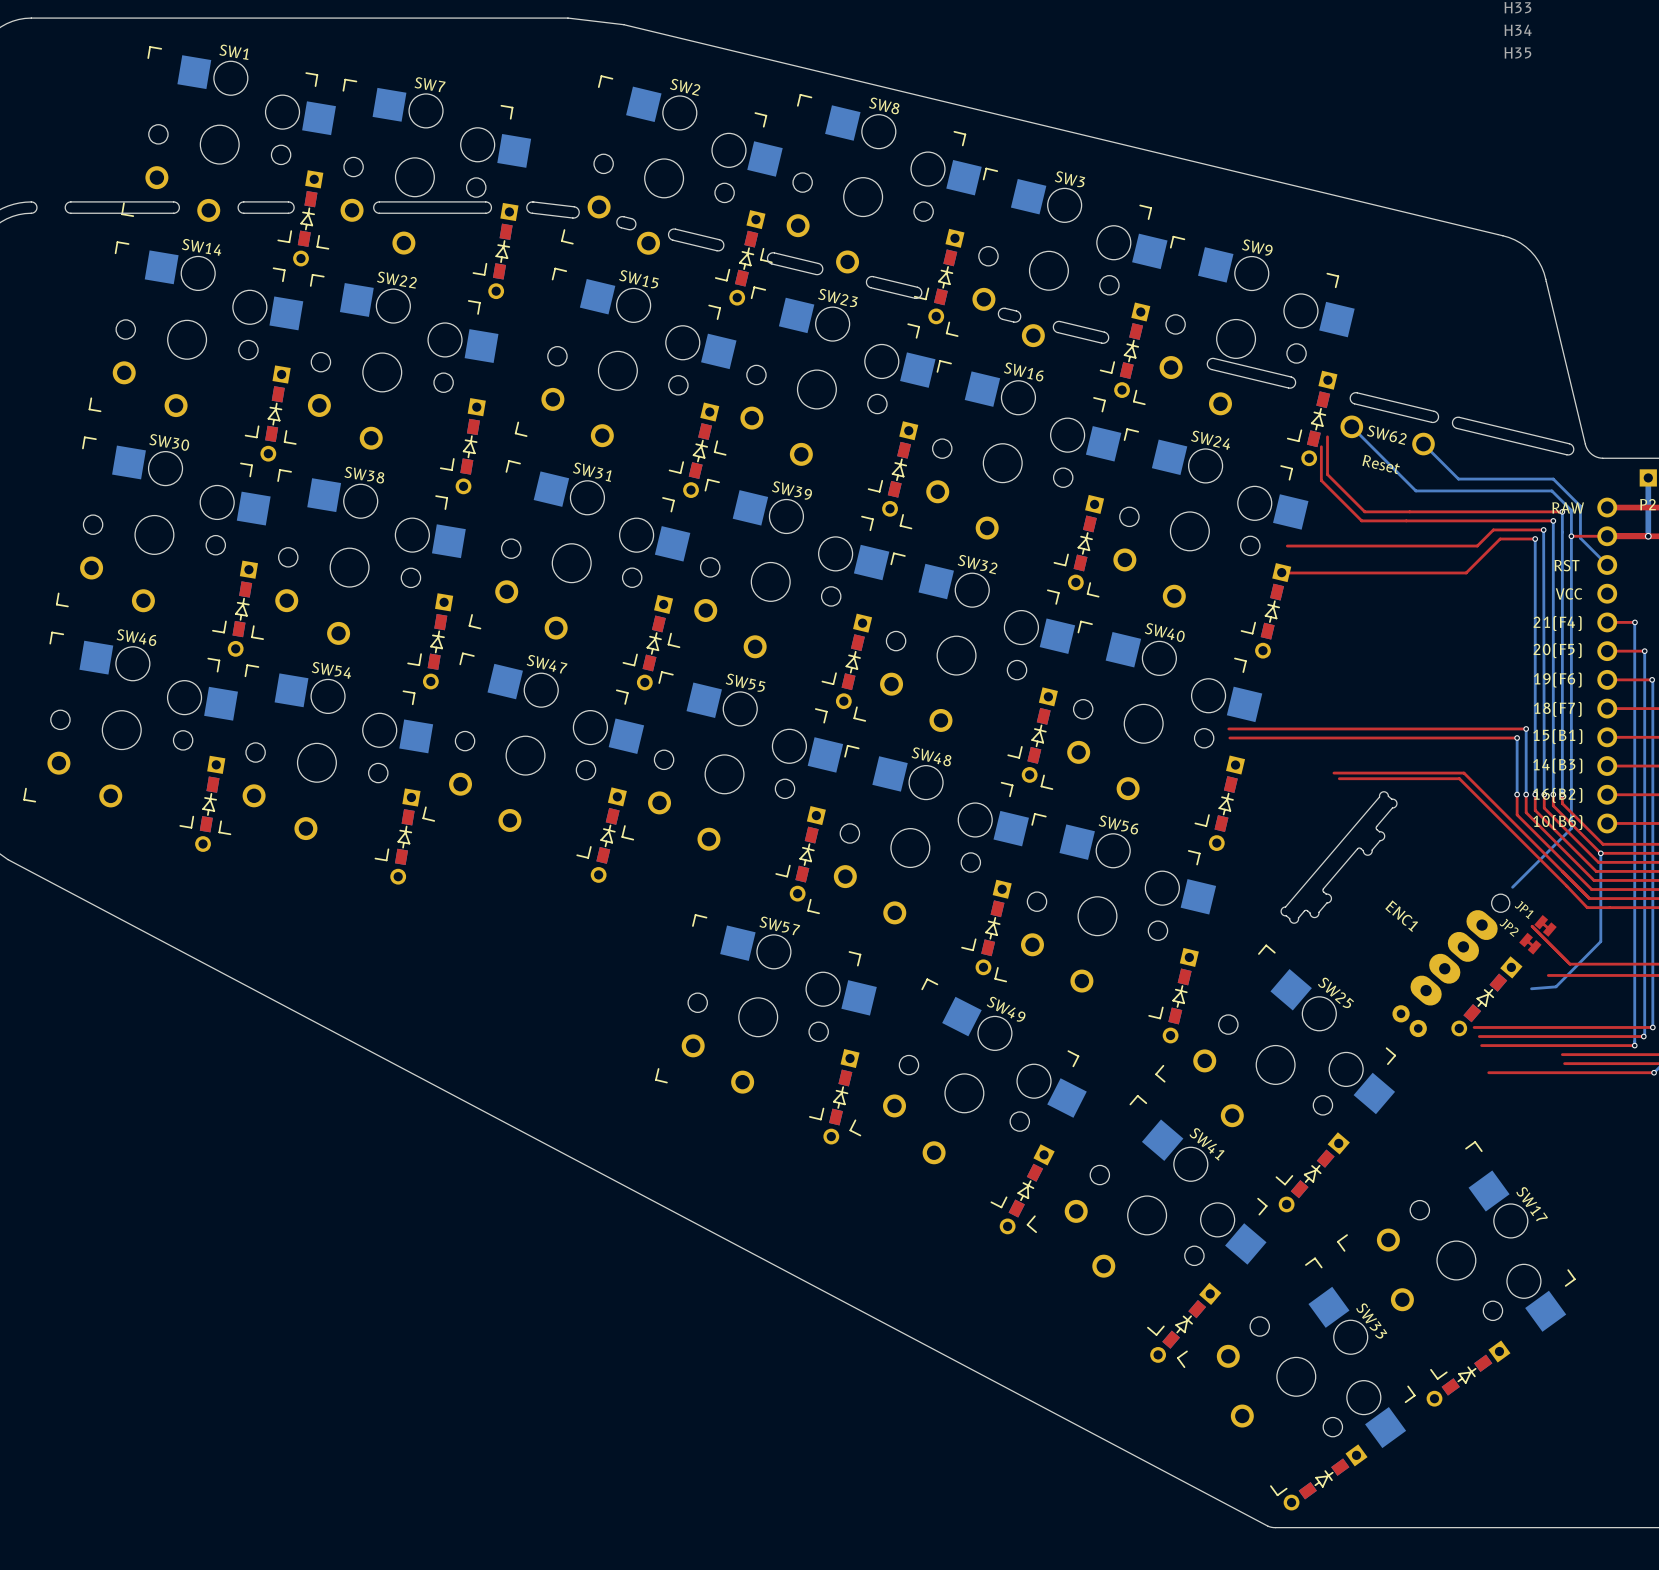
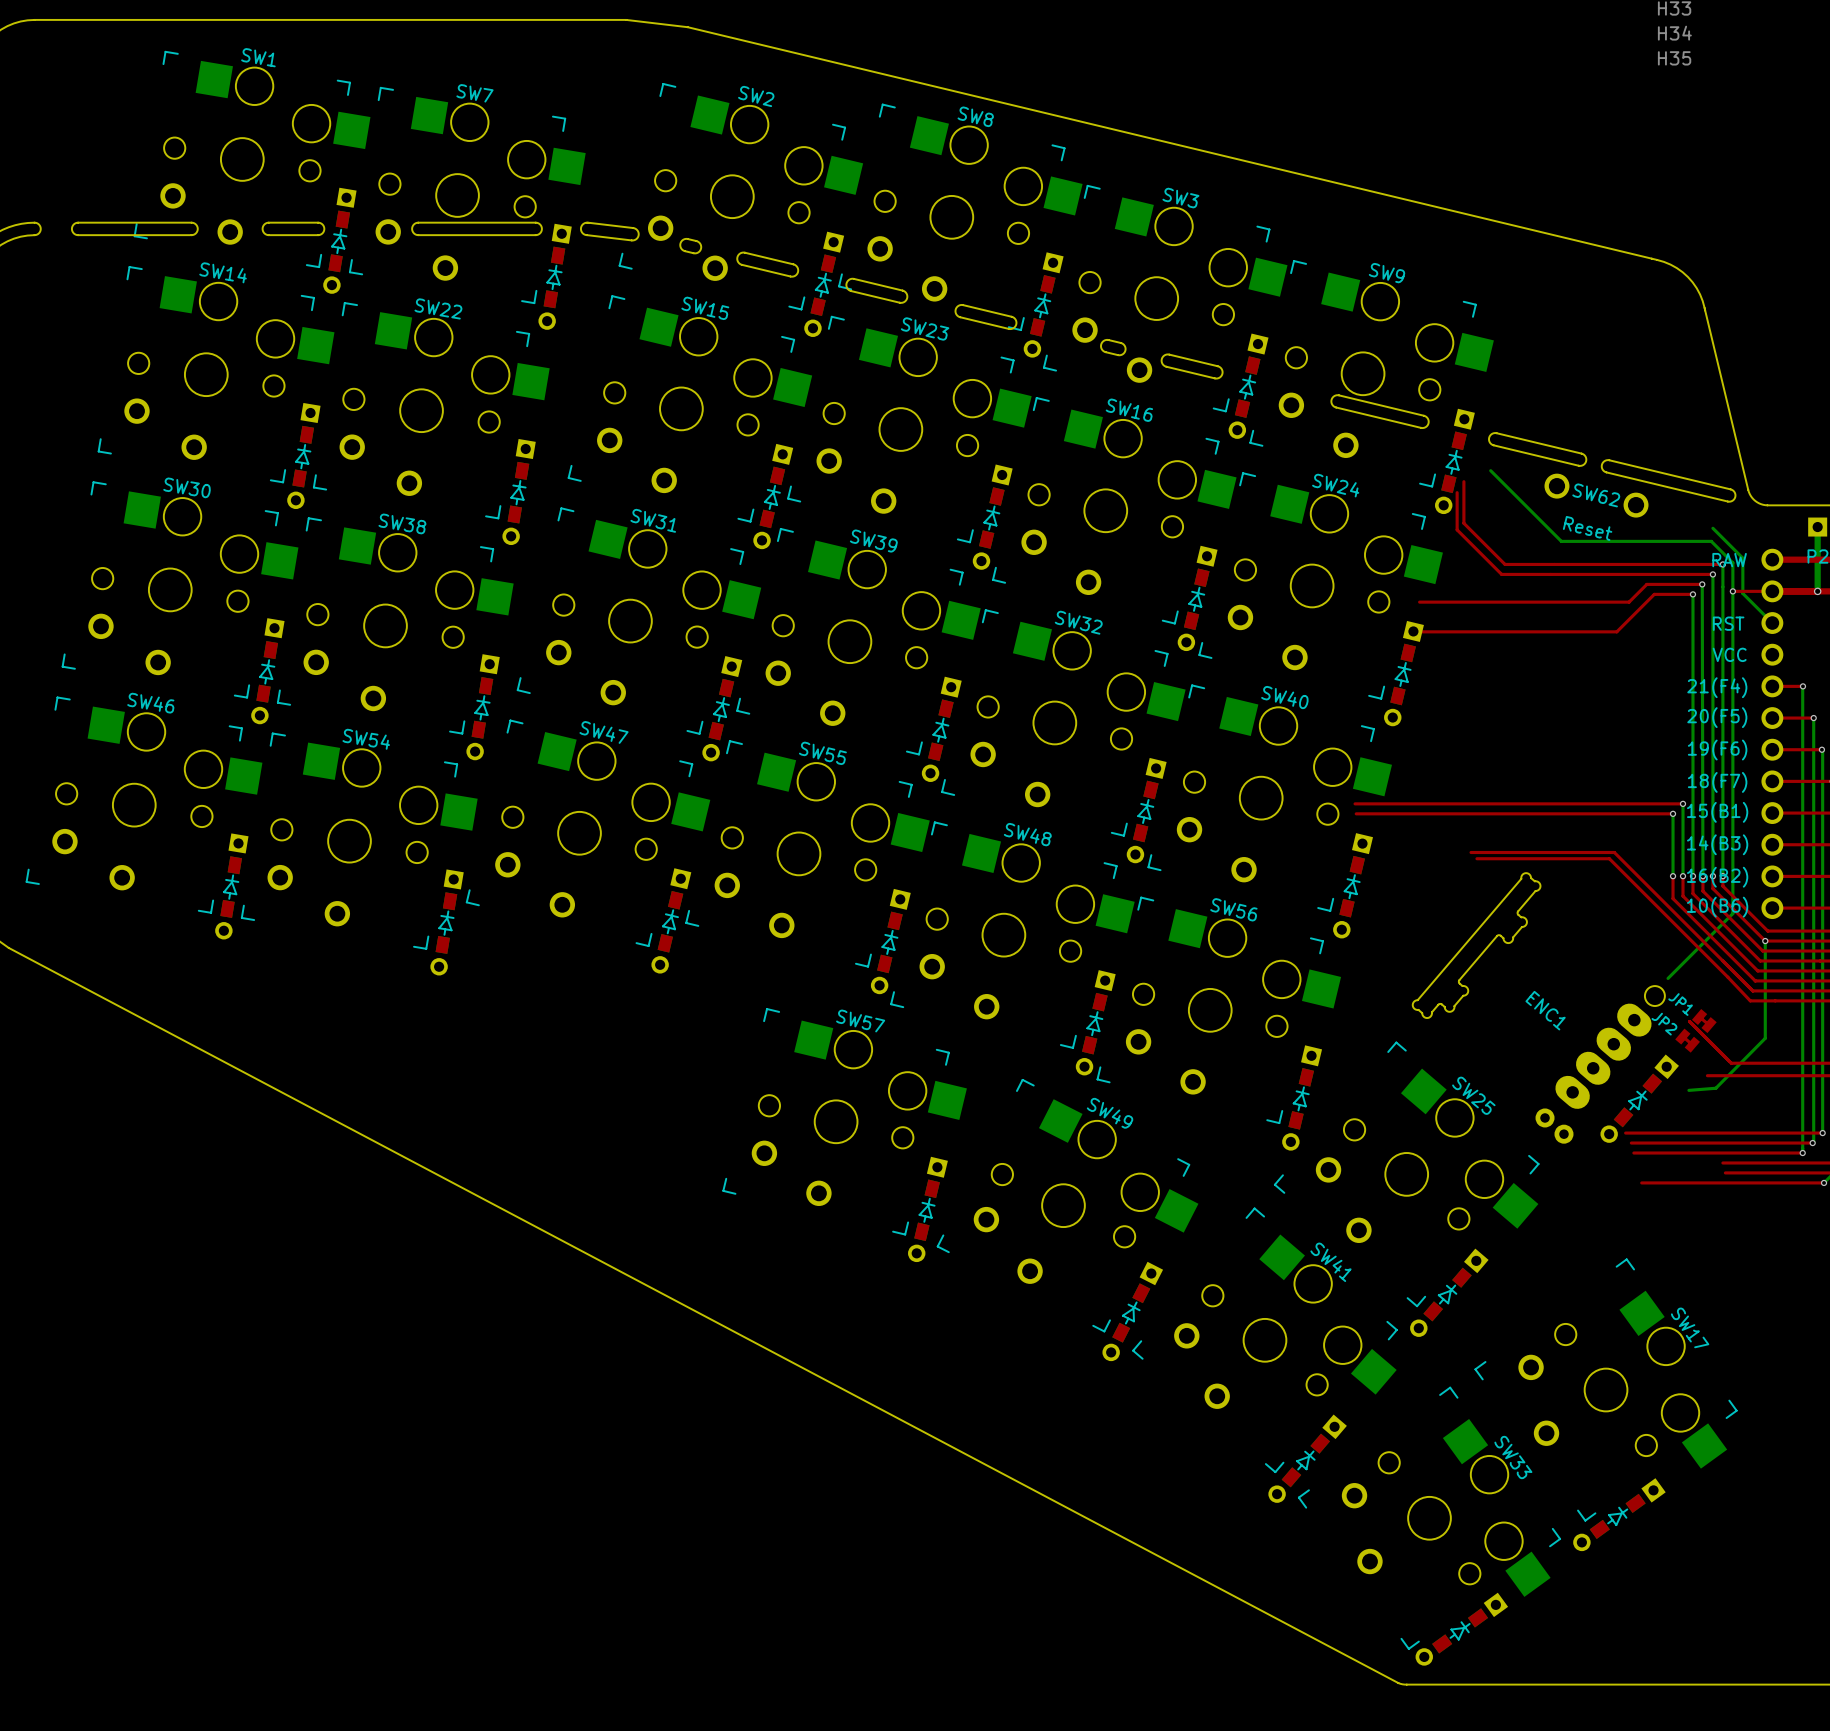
SW62 position: (1387, 435) -> (1596, 495)
bottom track: (1423, 444) (1458, 479) (1553, 479) -> none
text position: Reset (1381, 464) -> Reset (1587, 528)

